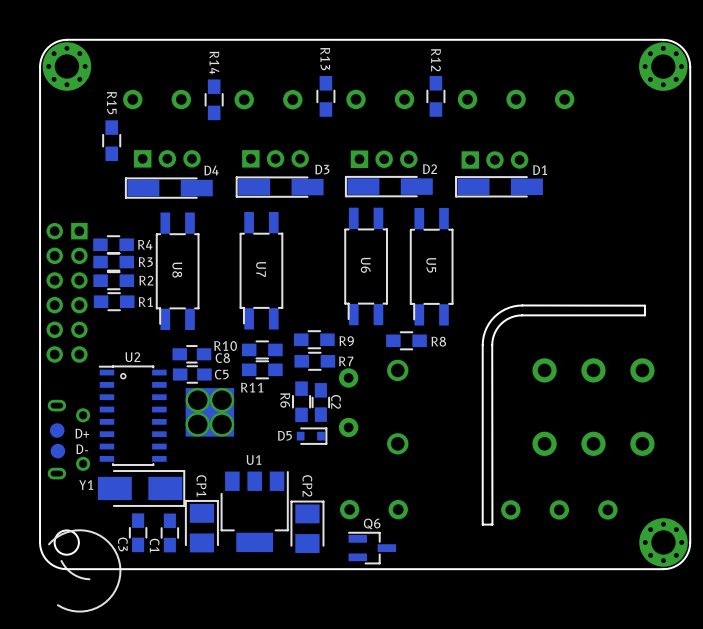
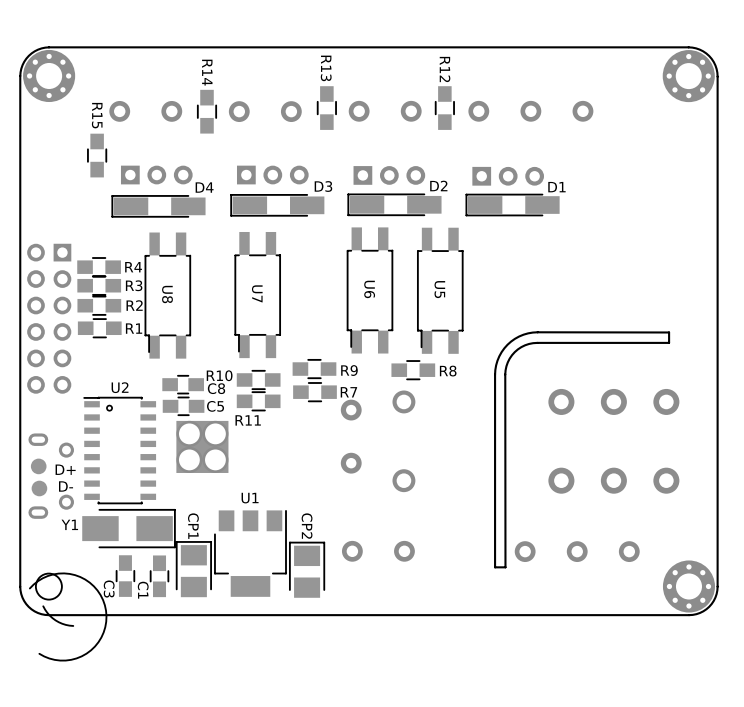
R6: (301, 401) -> none
C2: (320, 402) -> none
D5: (311, 436) -> none
Q6: (372, 548) -> none

